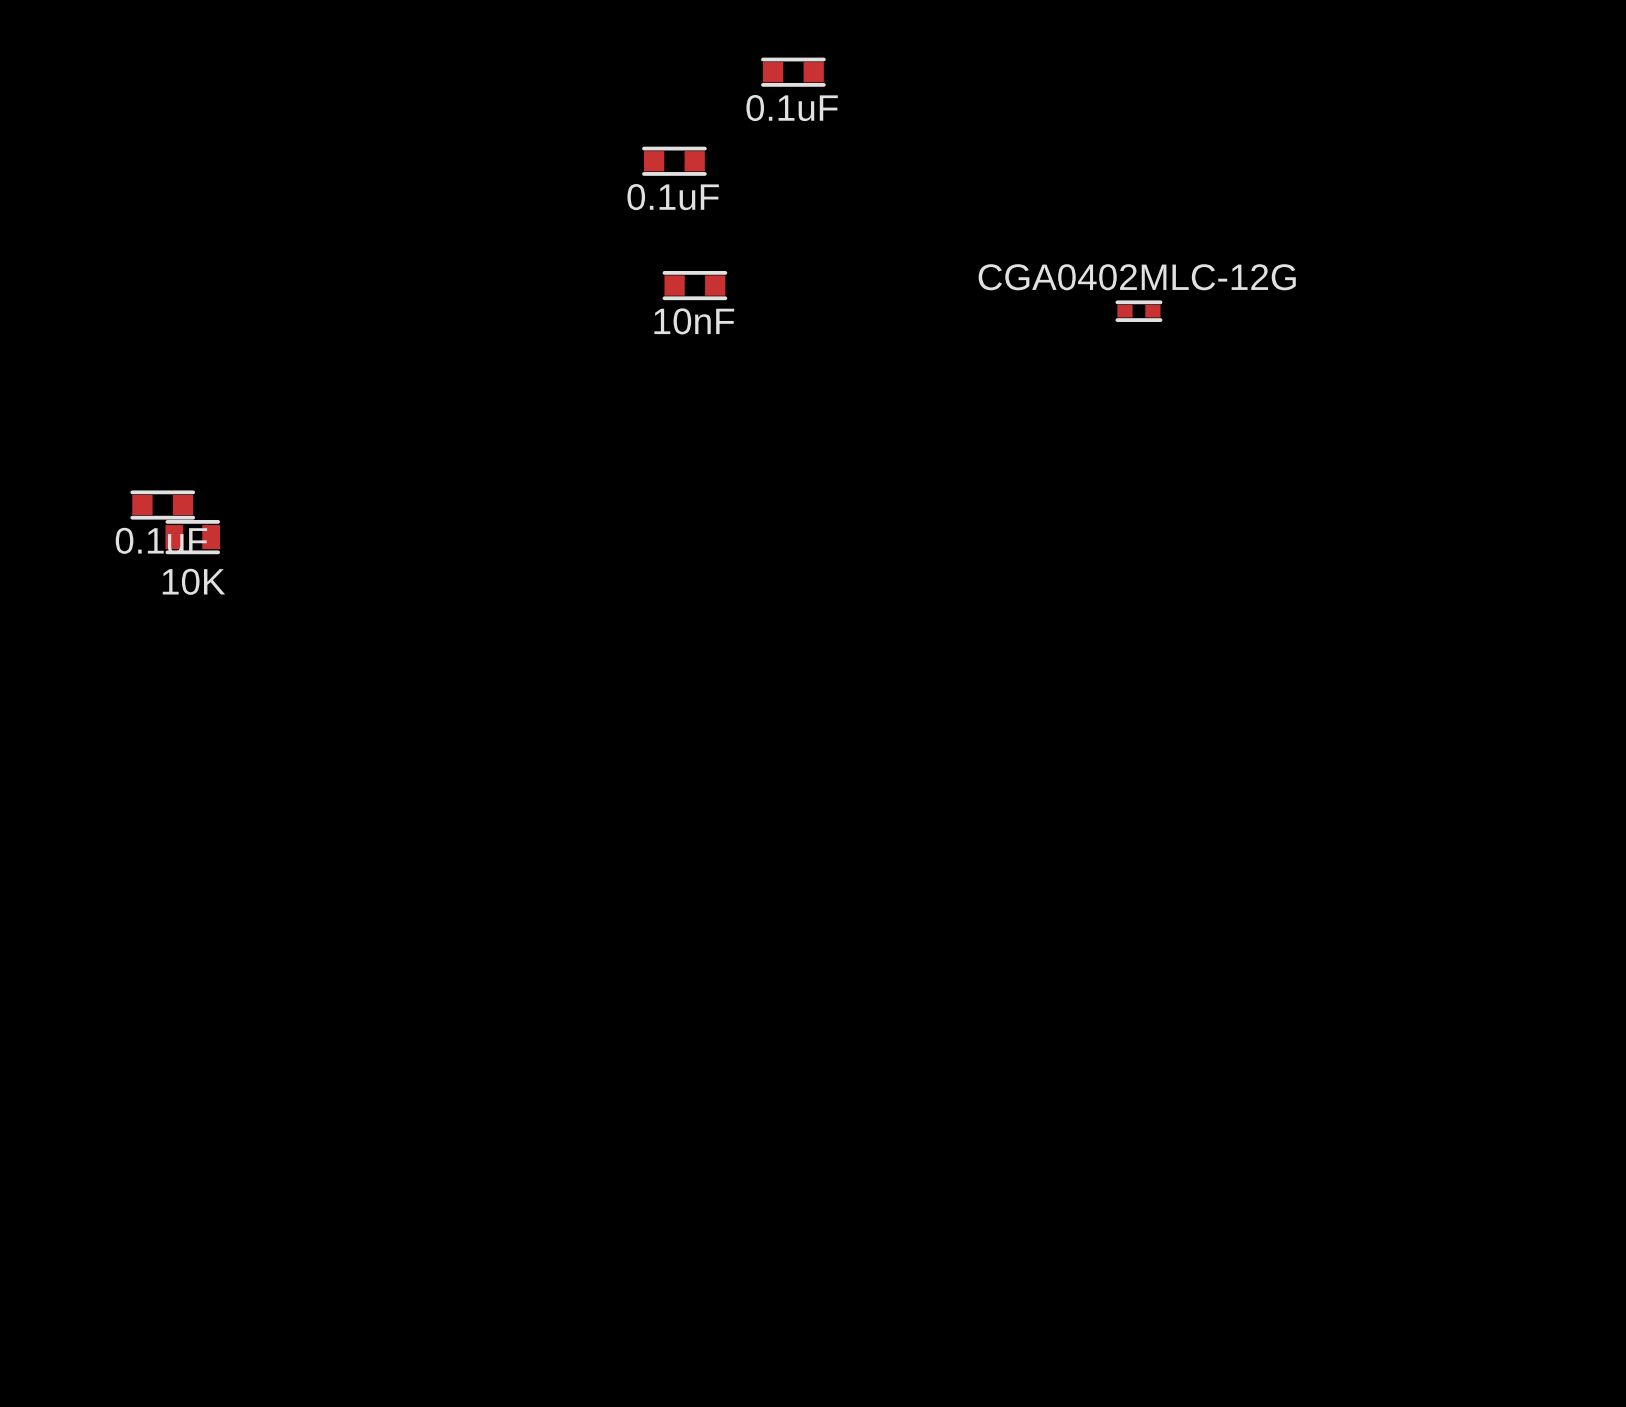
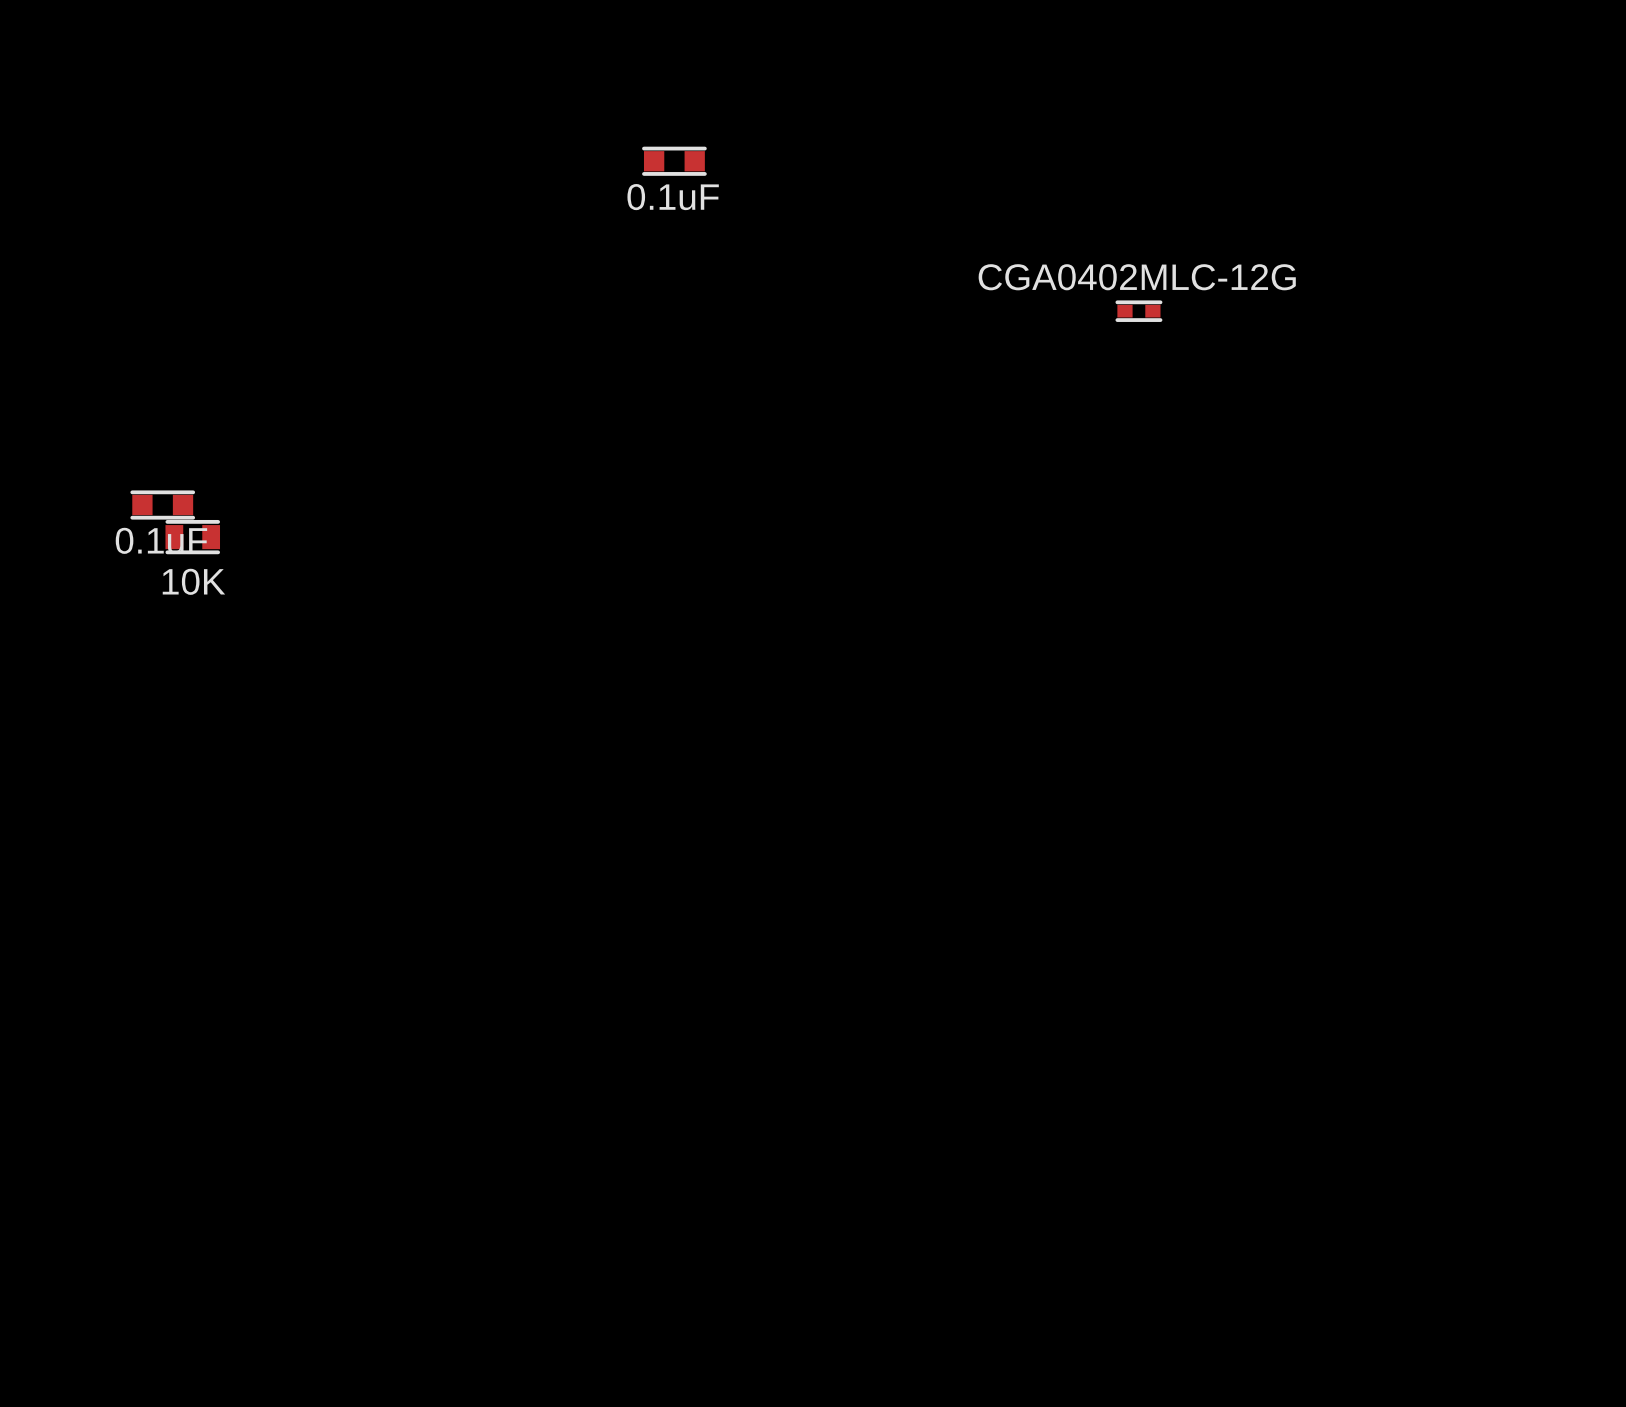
part: 0.1uF (793, 72) -> none
part: 10nF (694, 285) -> none

